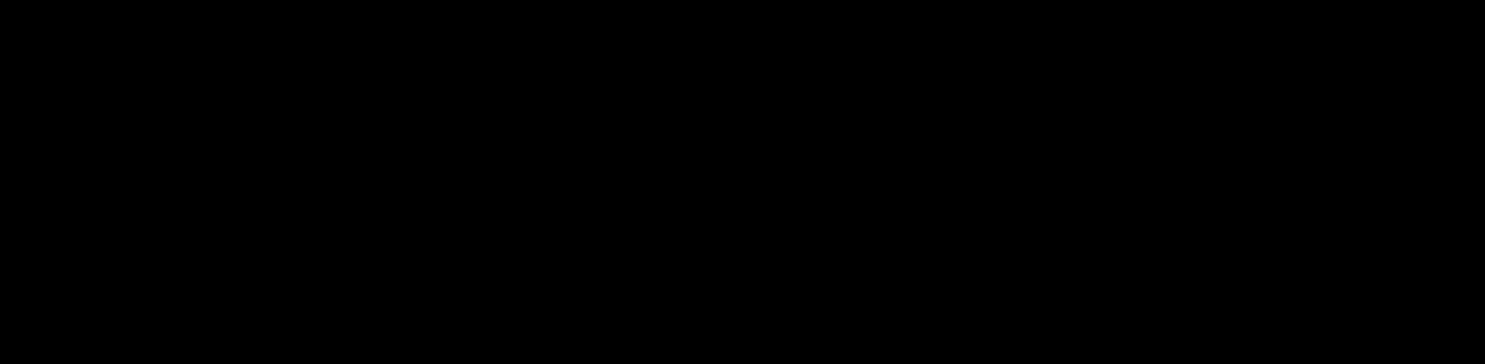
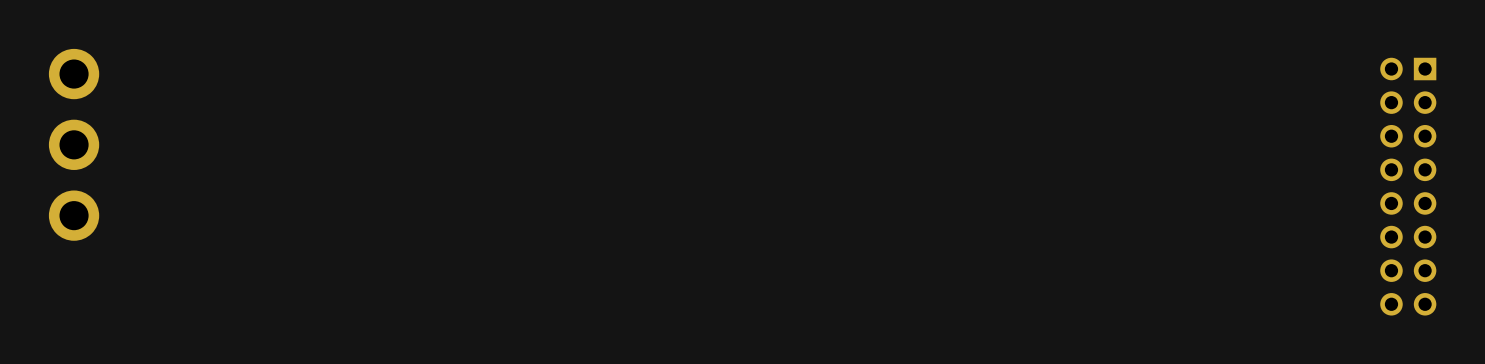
part: none -> (74, 74)
part: none -> (74, 144)
part: none -> (1408, 186)
part: none -> (74, 215)

